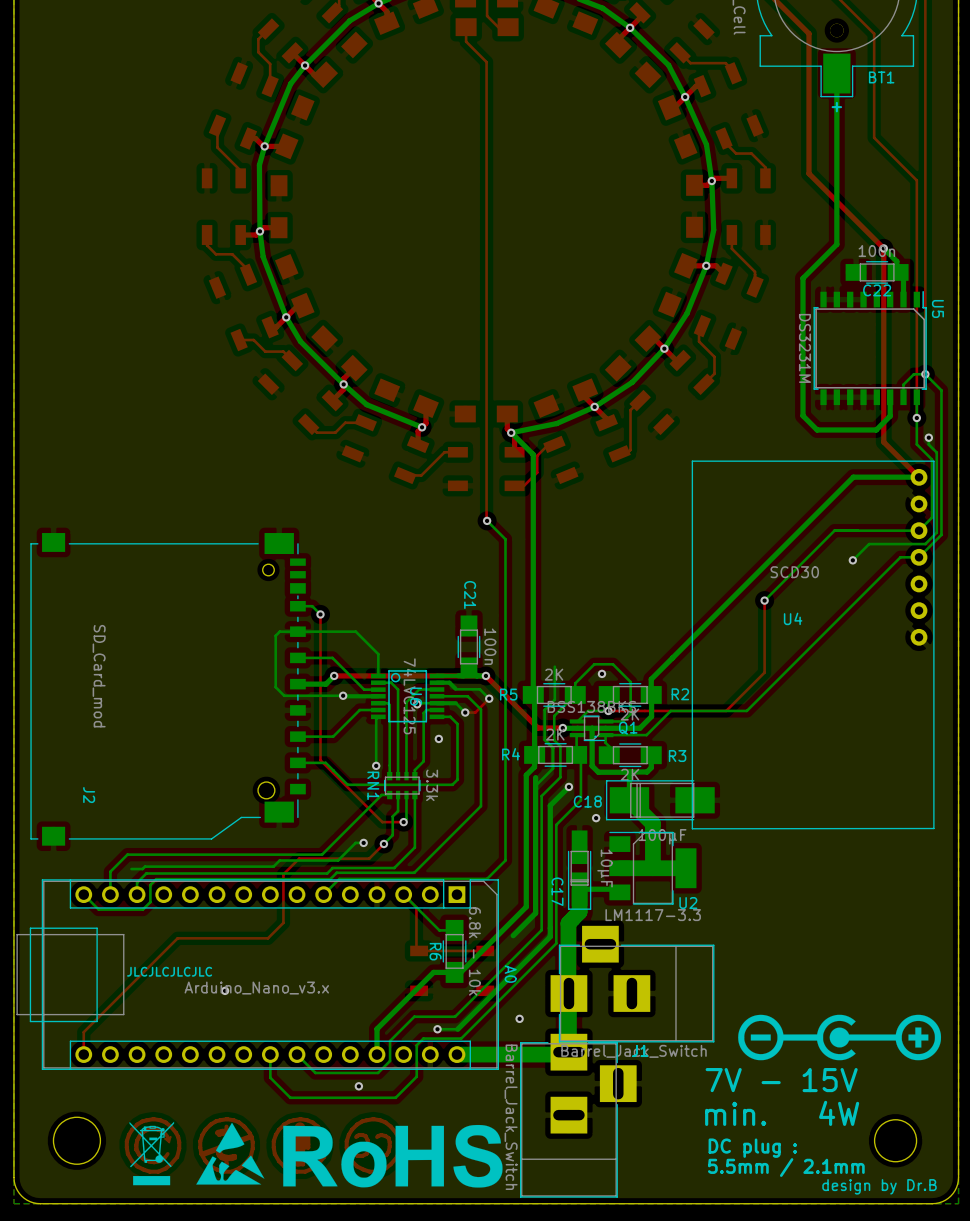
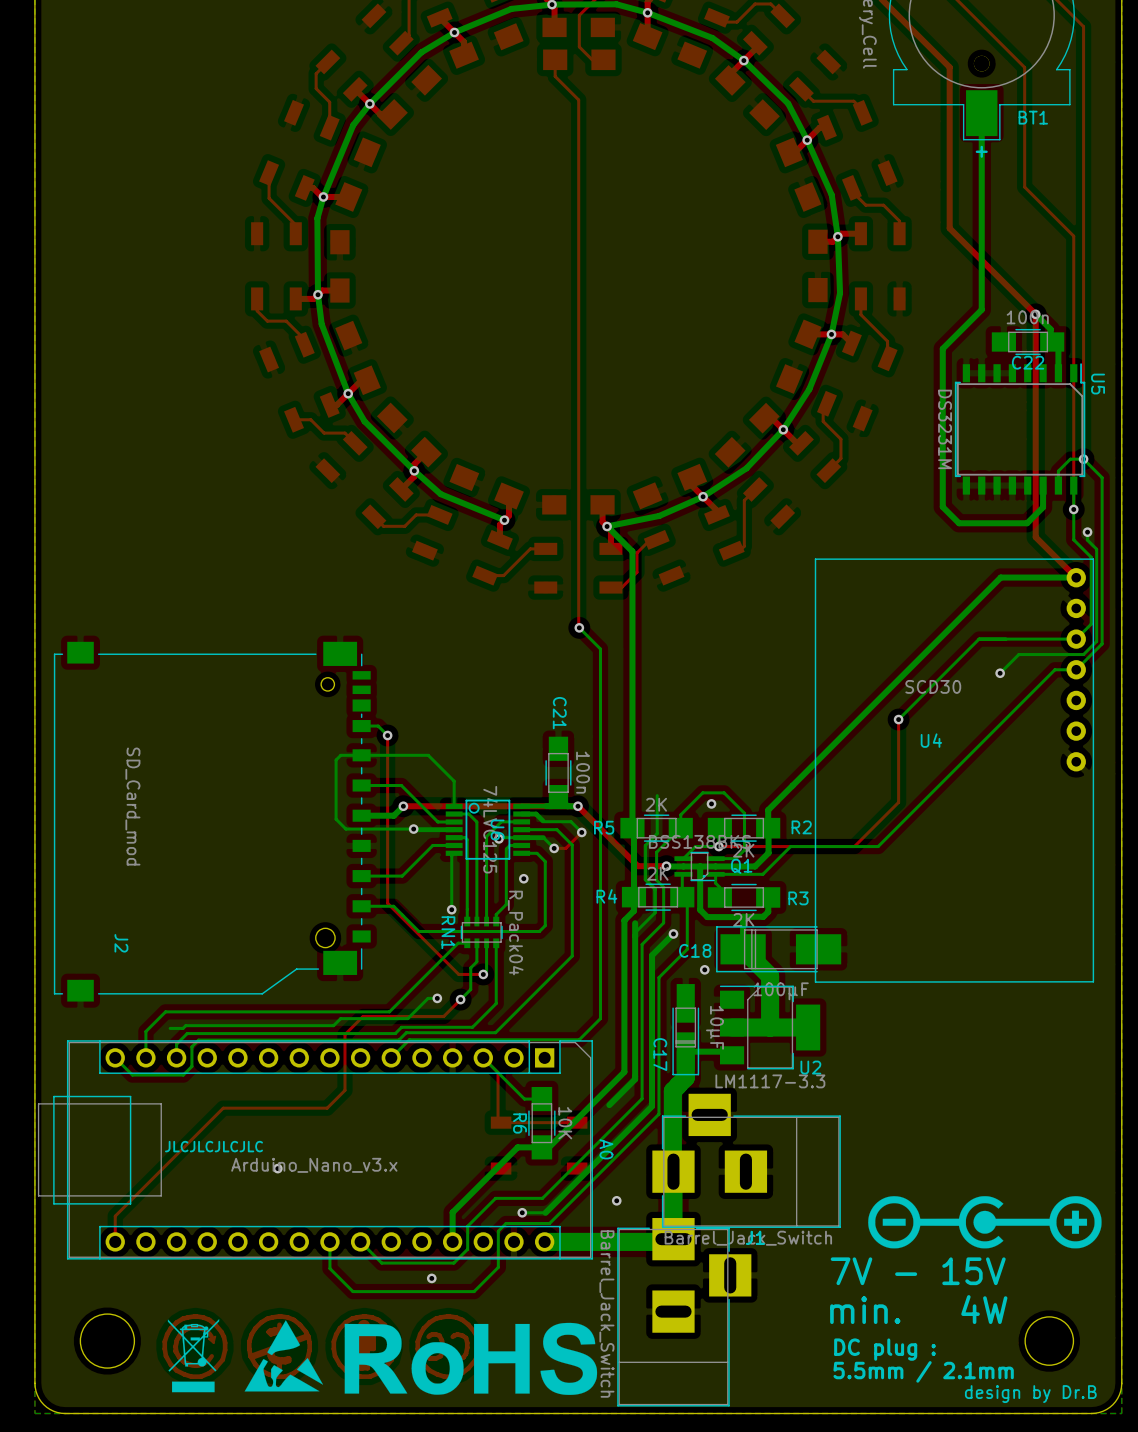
RN1 value: 3.3k (432, 785) -> R_Pack04 (515, 933)
R6 value: 6.8k - 10k (474, 951) -> 10K (565, 1123)

